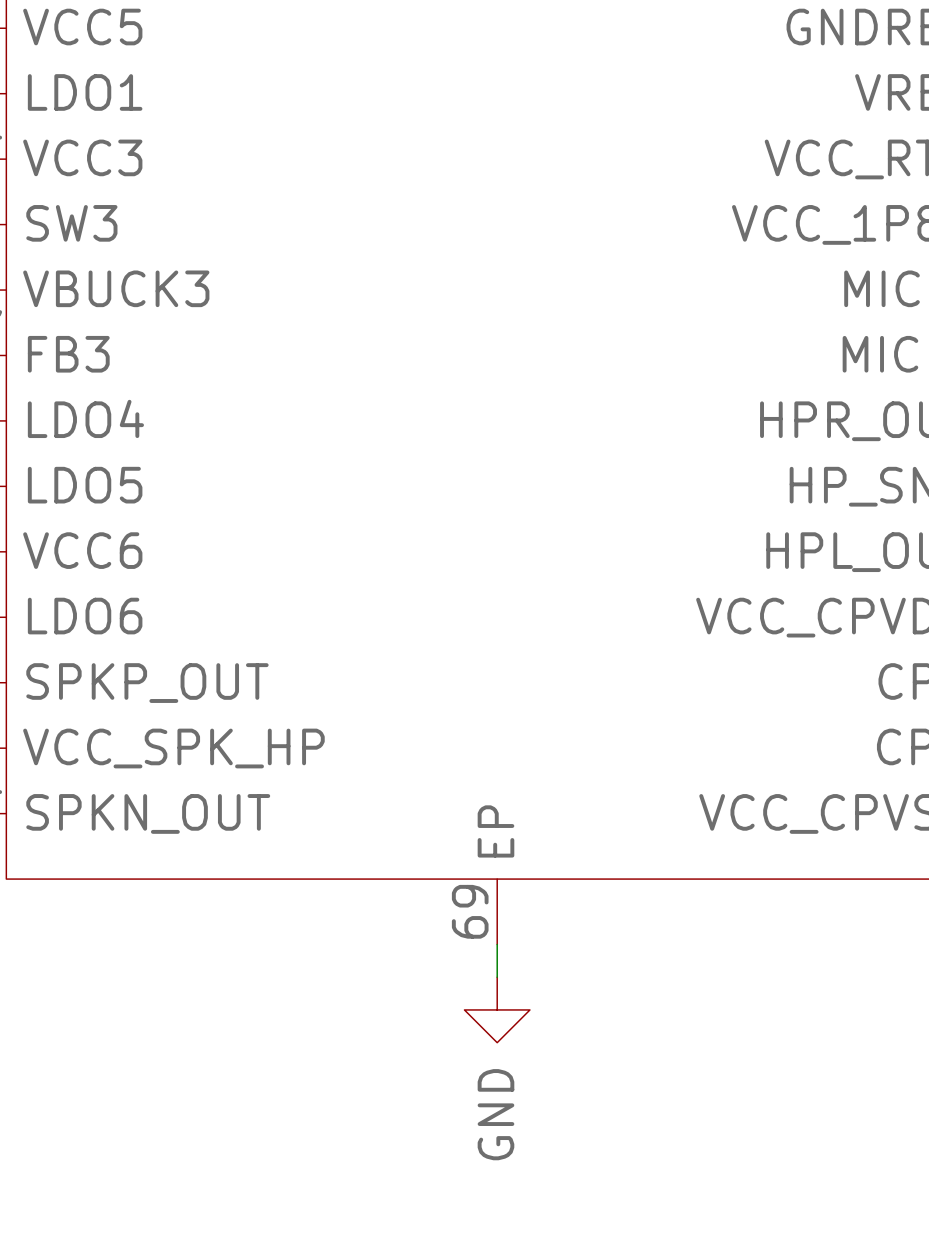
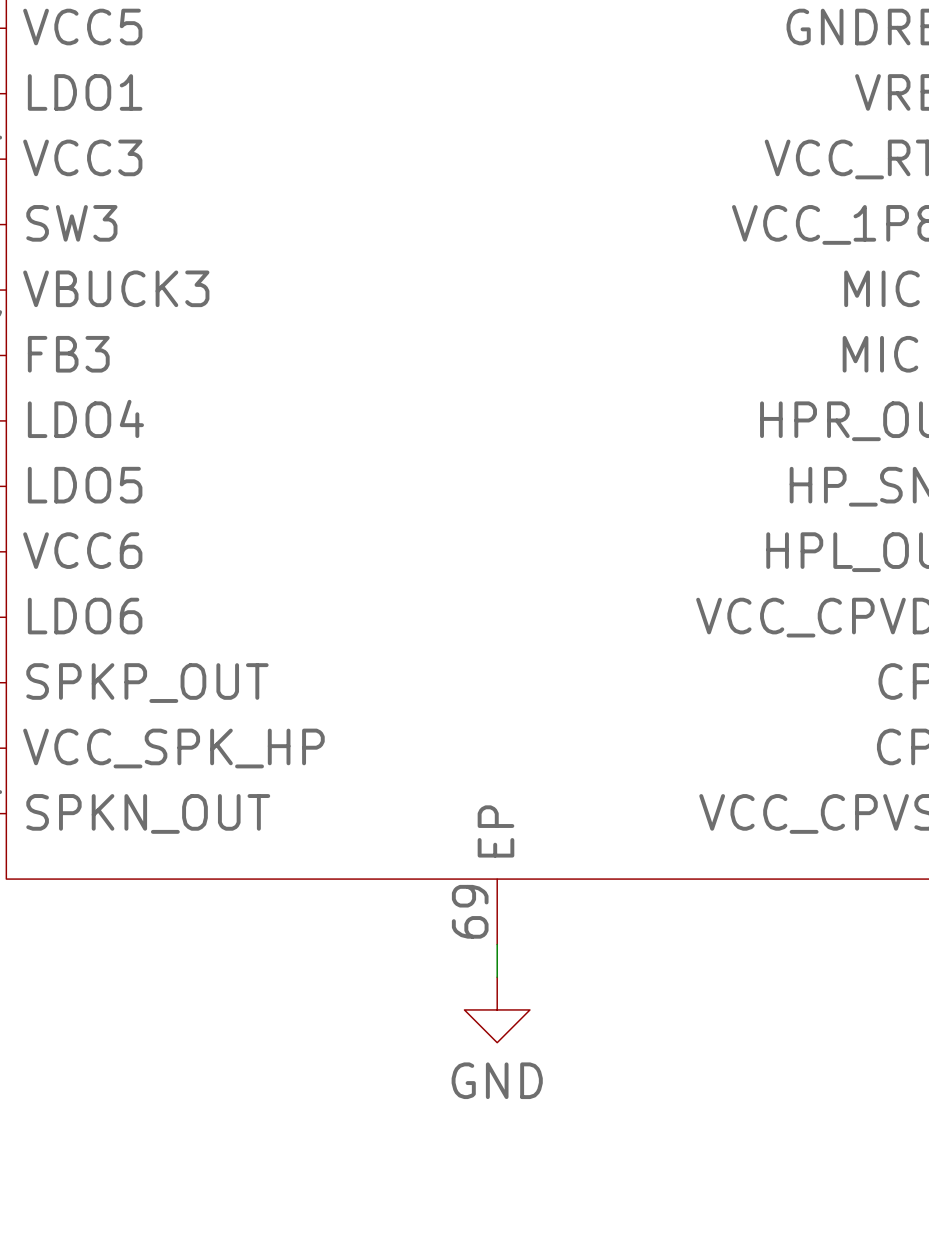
power symbol text rotation: 0° (495, 1114) -> 90° clockwise (497, 1080)

